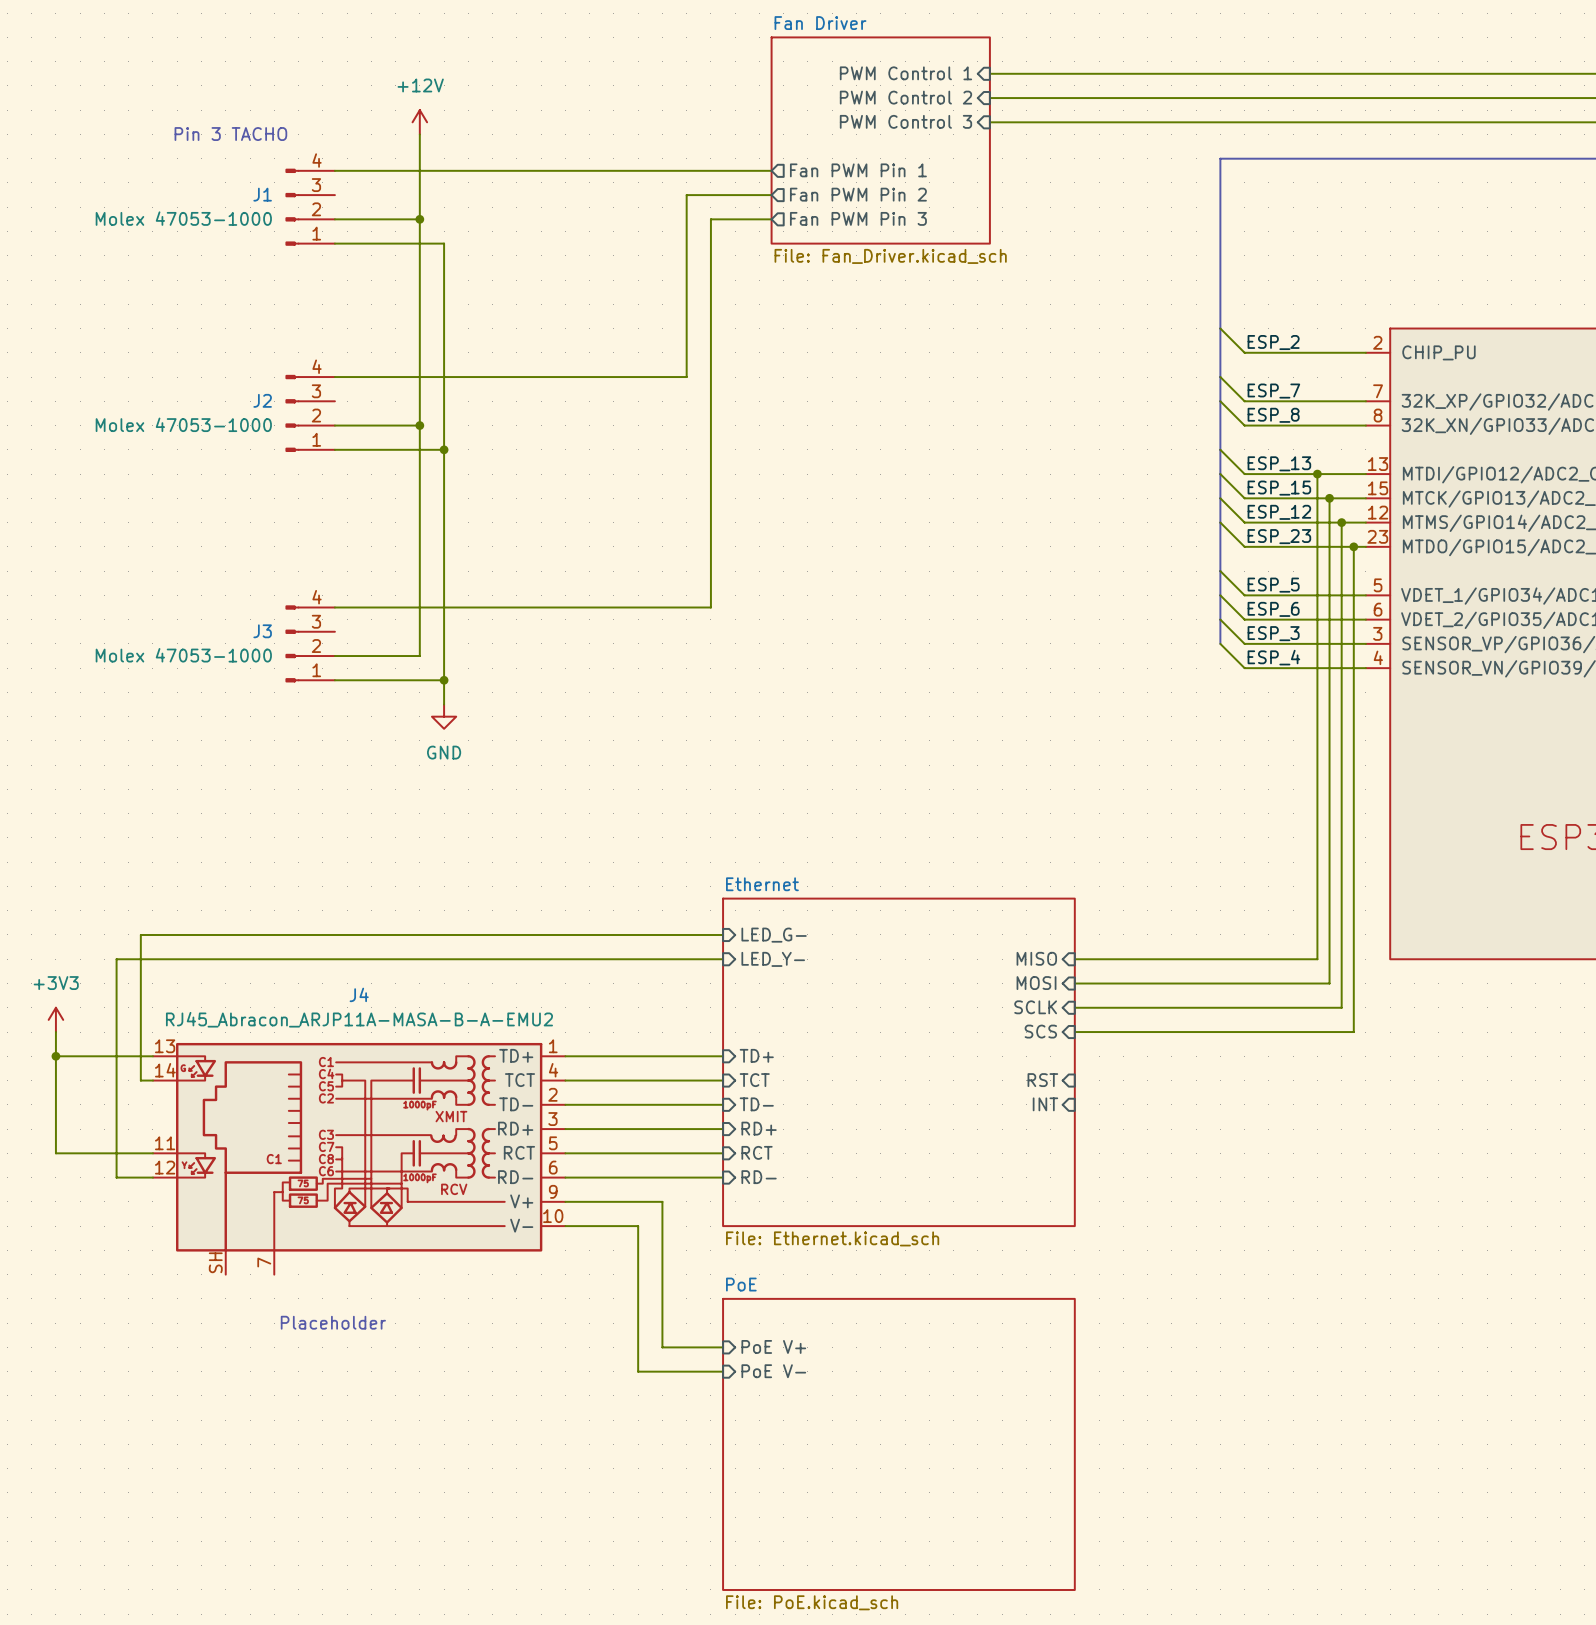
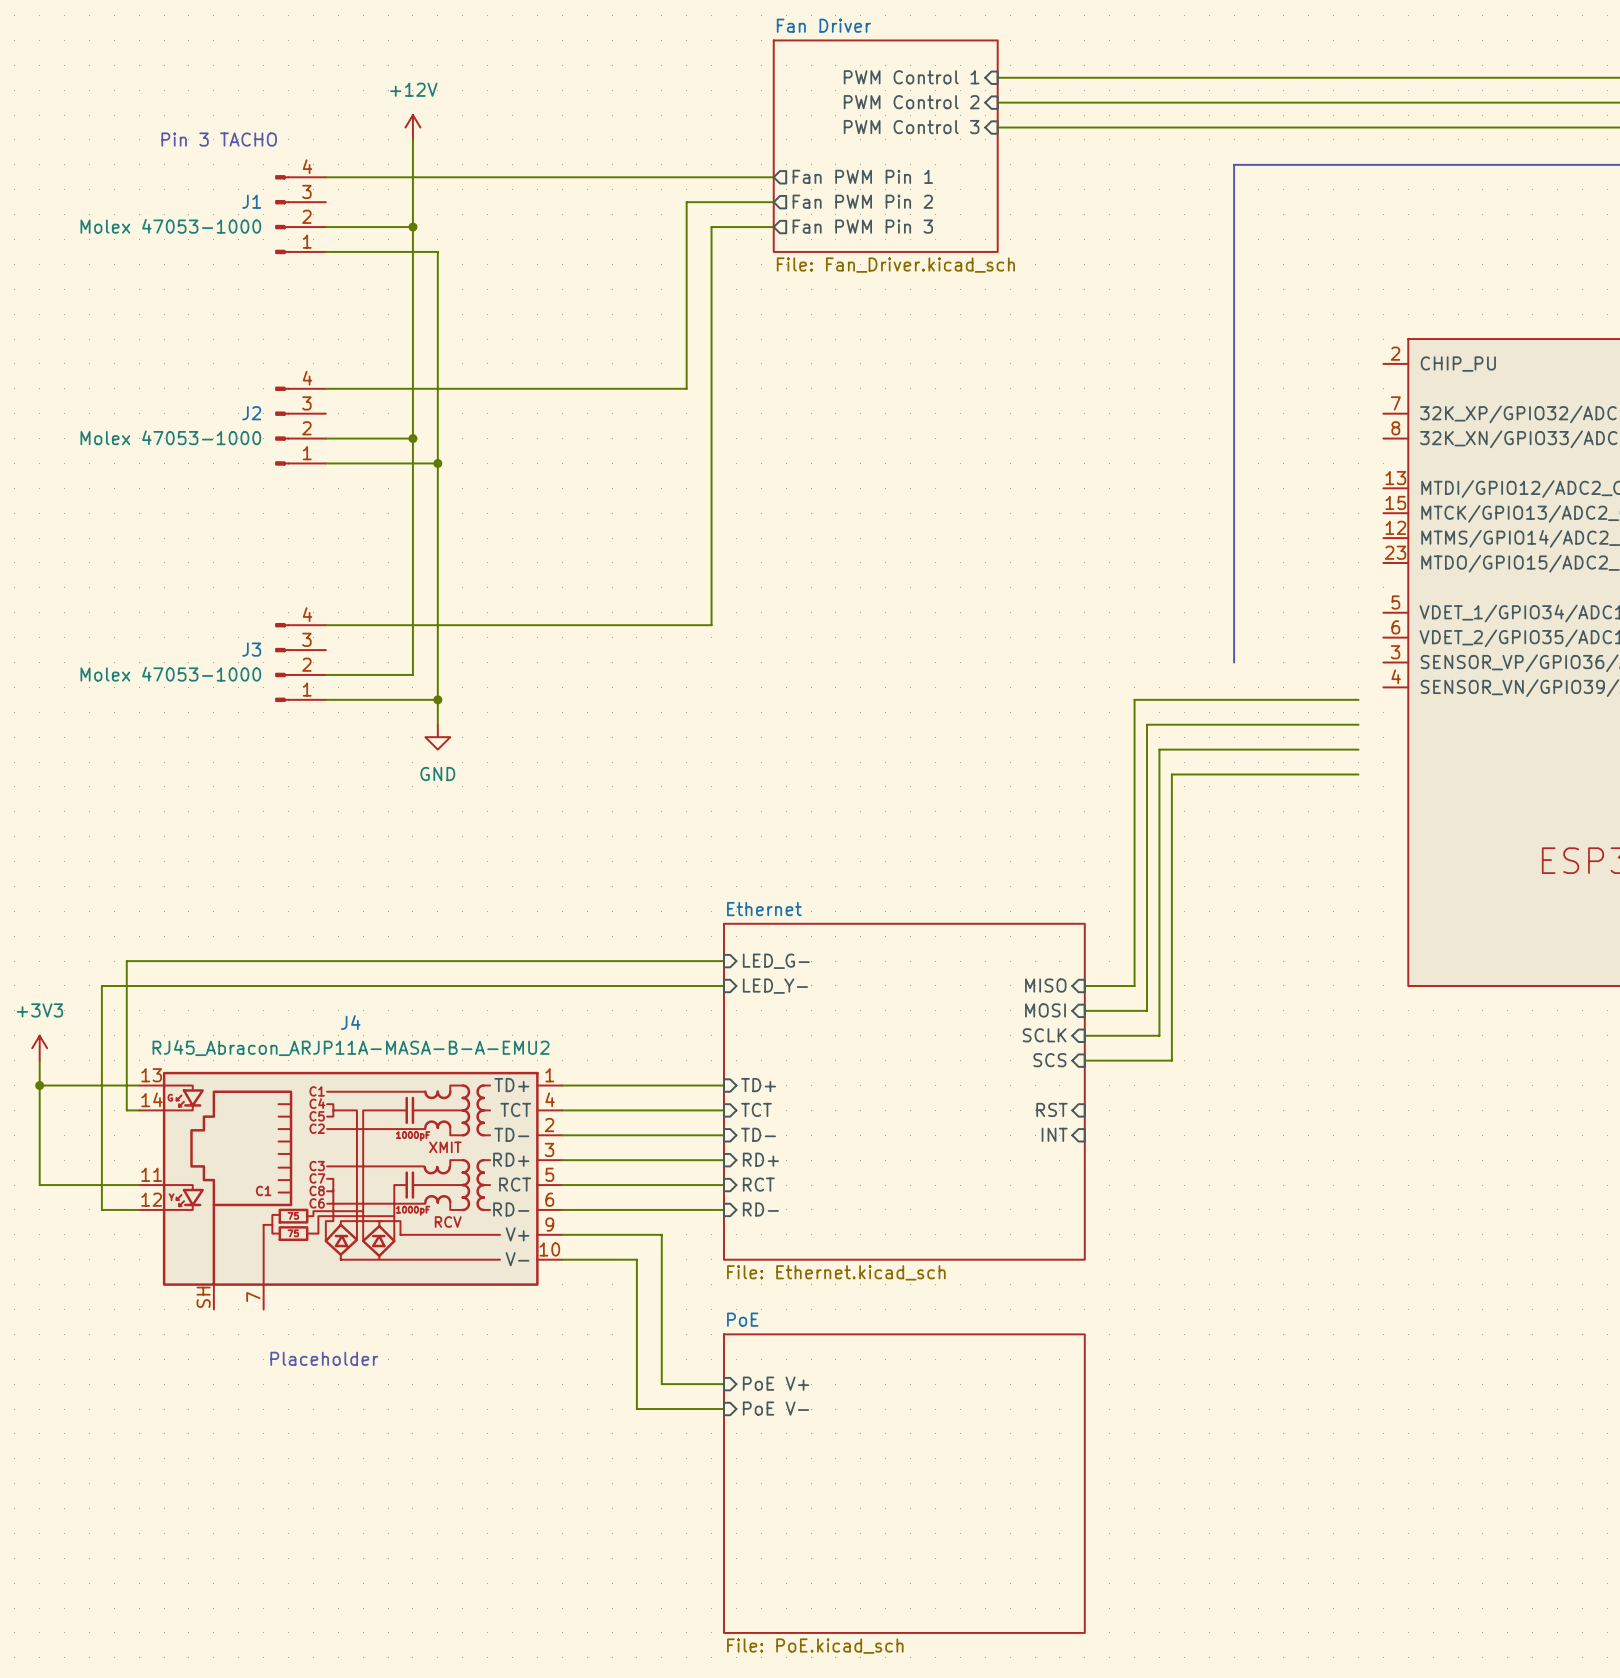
wire: (1220, 328) (1244, 352) (1365, 352) -> none
label: ESP_2 (1273, 342) -> none
wire: (1220, 377) (1244, 401) (1365, 401) -> none
label: ESP_7 (1273, 391) -> none
wire: (1220, 401) (1244, 425) (1365, 425) -> none
label: ESP_8 (1273, 415) -> none
wire: (1220, 449) (1244, 474) (1365, 474) -> none
label: ESP_13 (1279, 463) -> none
wire: (1220, 474) (1244, 498) (1365, 498) -> none
wire: (1317, 474) (1317, 959) (1123, 959) -> (1358, 699) (1134, 699) (1134, 985)
junction: (1317, 474) -> none
label: ESP_15 (1279, 488) -> none
wire: (1220, 498) (1244, 522) (1365, 522) -> none
wire: (1329, 498) (1329, 983) (1135, 983) -> (1358, 724) (1147, 724) (1147, 1010)
junction: (1329, 498) -> none
label: ESP_12 (1279, 512) -> none
wire: (1220, 522) (1244, 546) (1365, 546) -> none
wire: (1341, 522) (1341, 1007) (1147, 1007) -> (1358, 749) (1159, 749) (1159, 1035)
junction: (1341, 522) -> none
label: ESP_23 (1279, 536) -> none
wire: (1353, 546) (1353, 1032) (1159, 1032) -> (1358, 774) (1171, 774) (1171, 1060)
junction: (1353, 546) -> none
wire: (1220, 571) (1244, 595) (1365, 595) -> none
label: ESP_5 (1273, 585) -> none
wire: (1220, 595) (1244, 619) (1365, 619) -> none
label: ESP_6 (1273, 609) -> none
wire: (1220, 619) (1244, 643) (1365, 643) -> none
label: ESP_3 (1273, 633) -> none
wire: (1220, 643) (1244, 668) (1365, 668) -> none
label: ESP_4 (1273, 657) -> none

